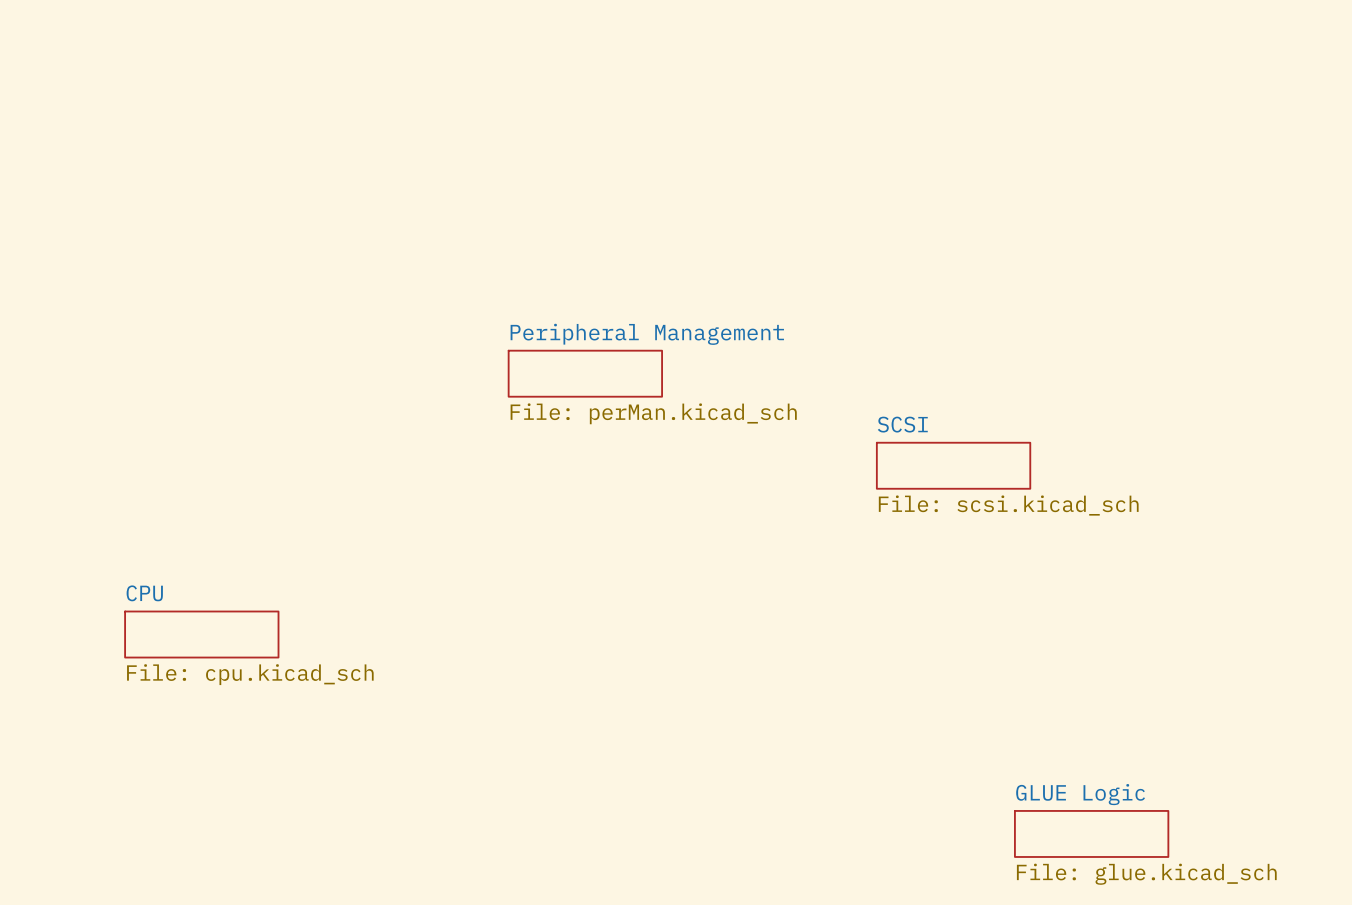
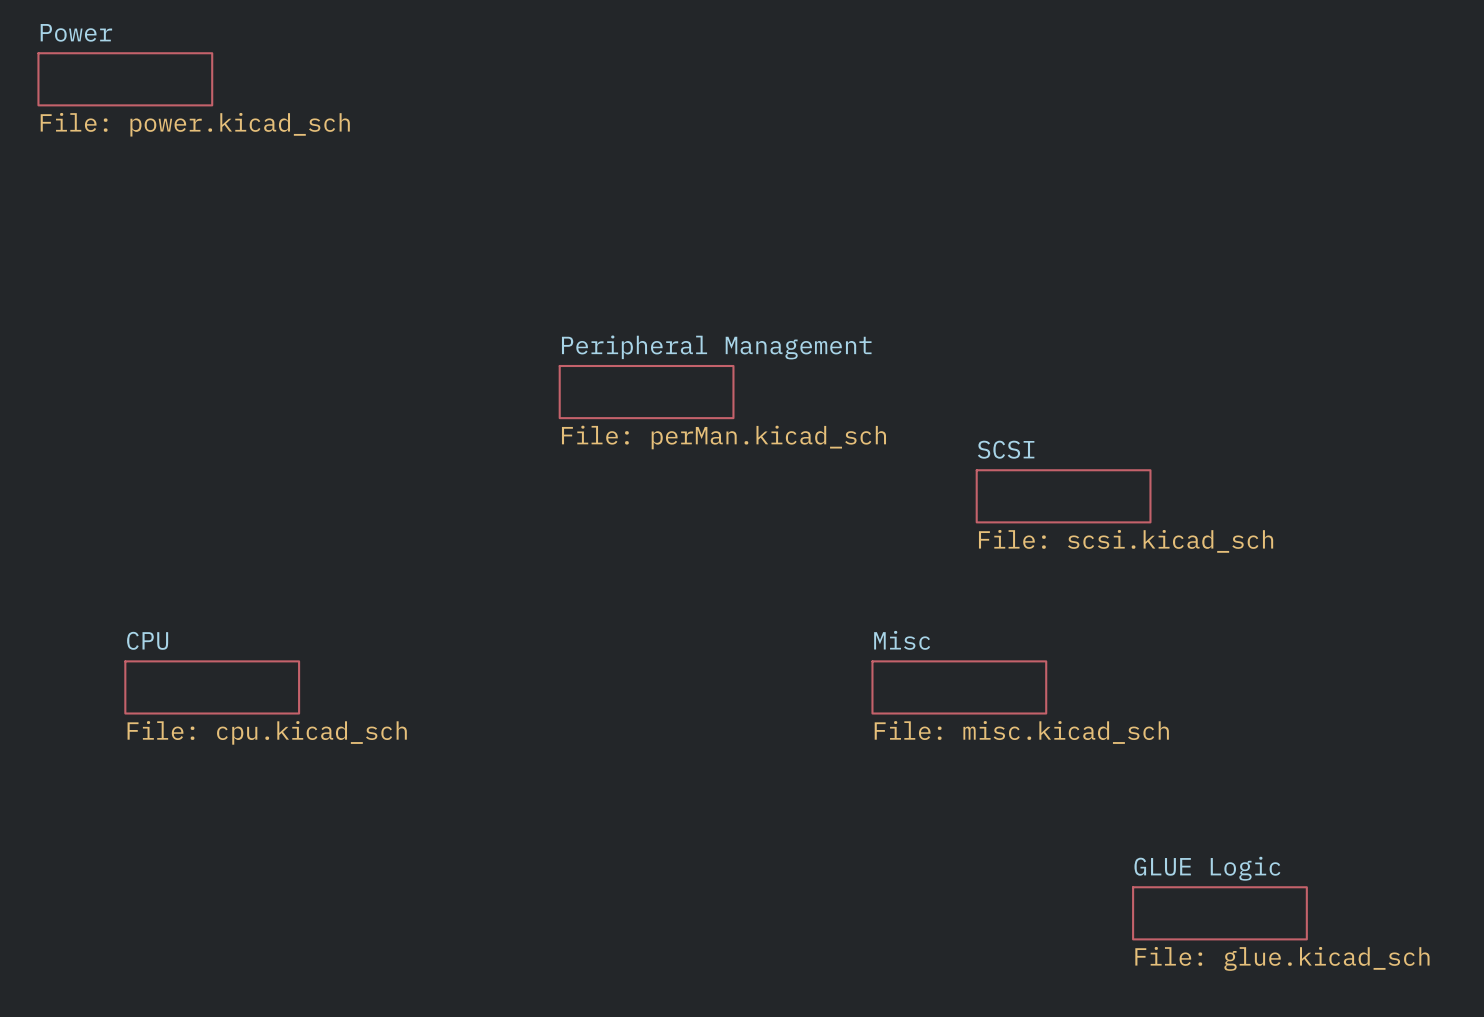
sheet Power: none -> File: power.kicad_sch (125, 79)
sheet Misc: none -> File: misc.kicad_sch (959, 687)

